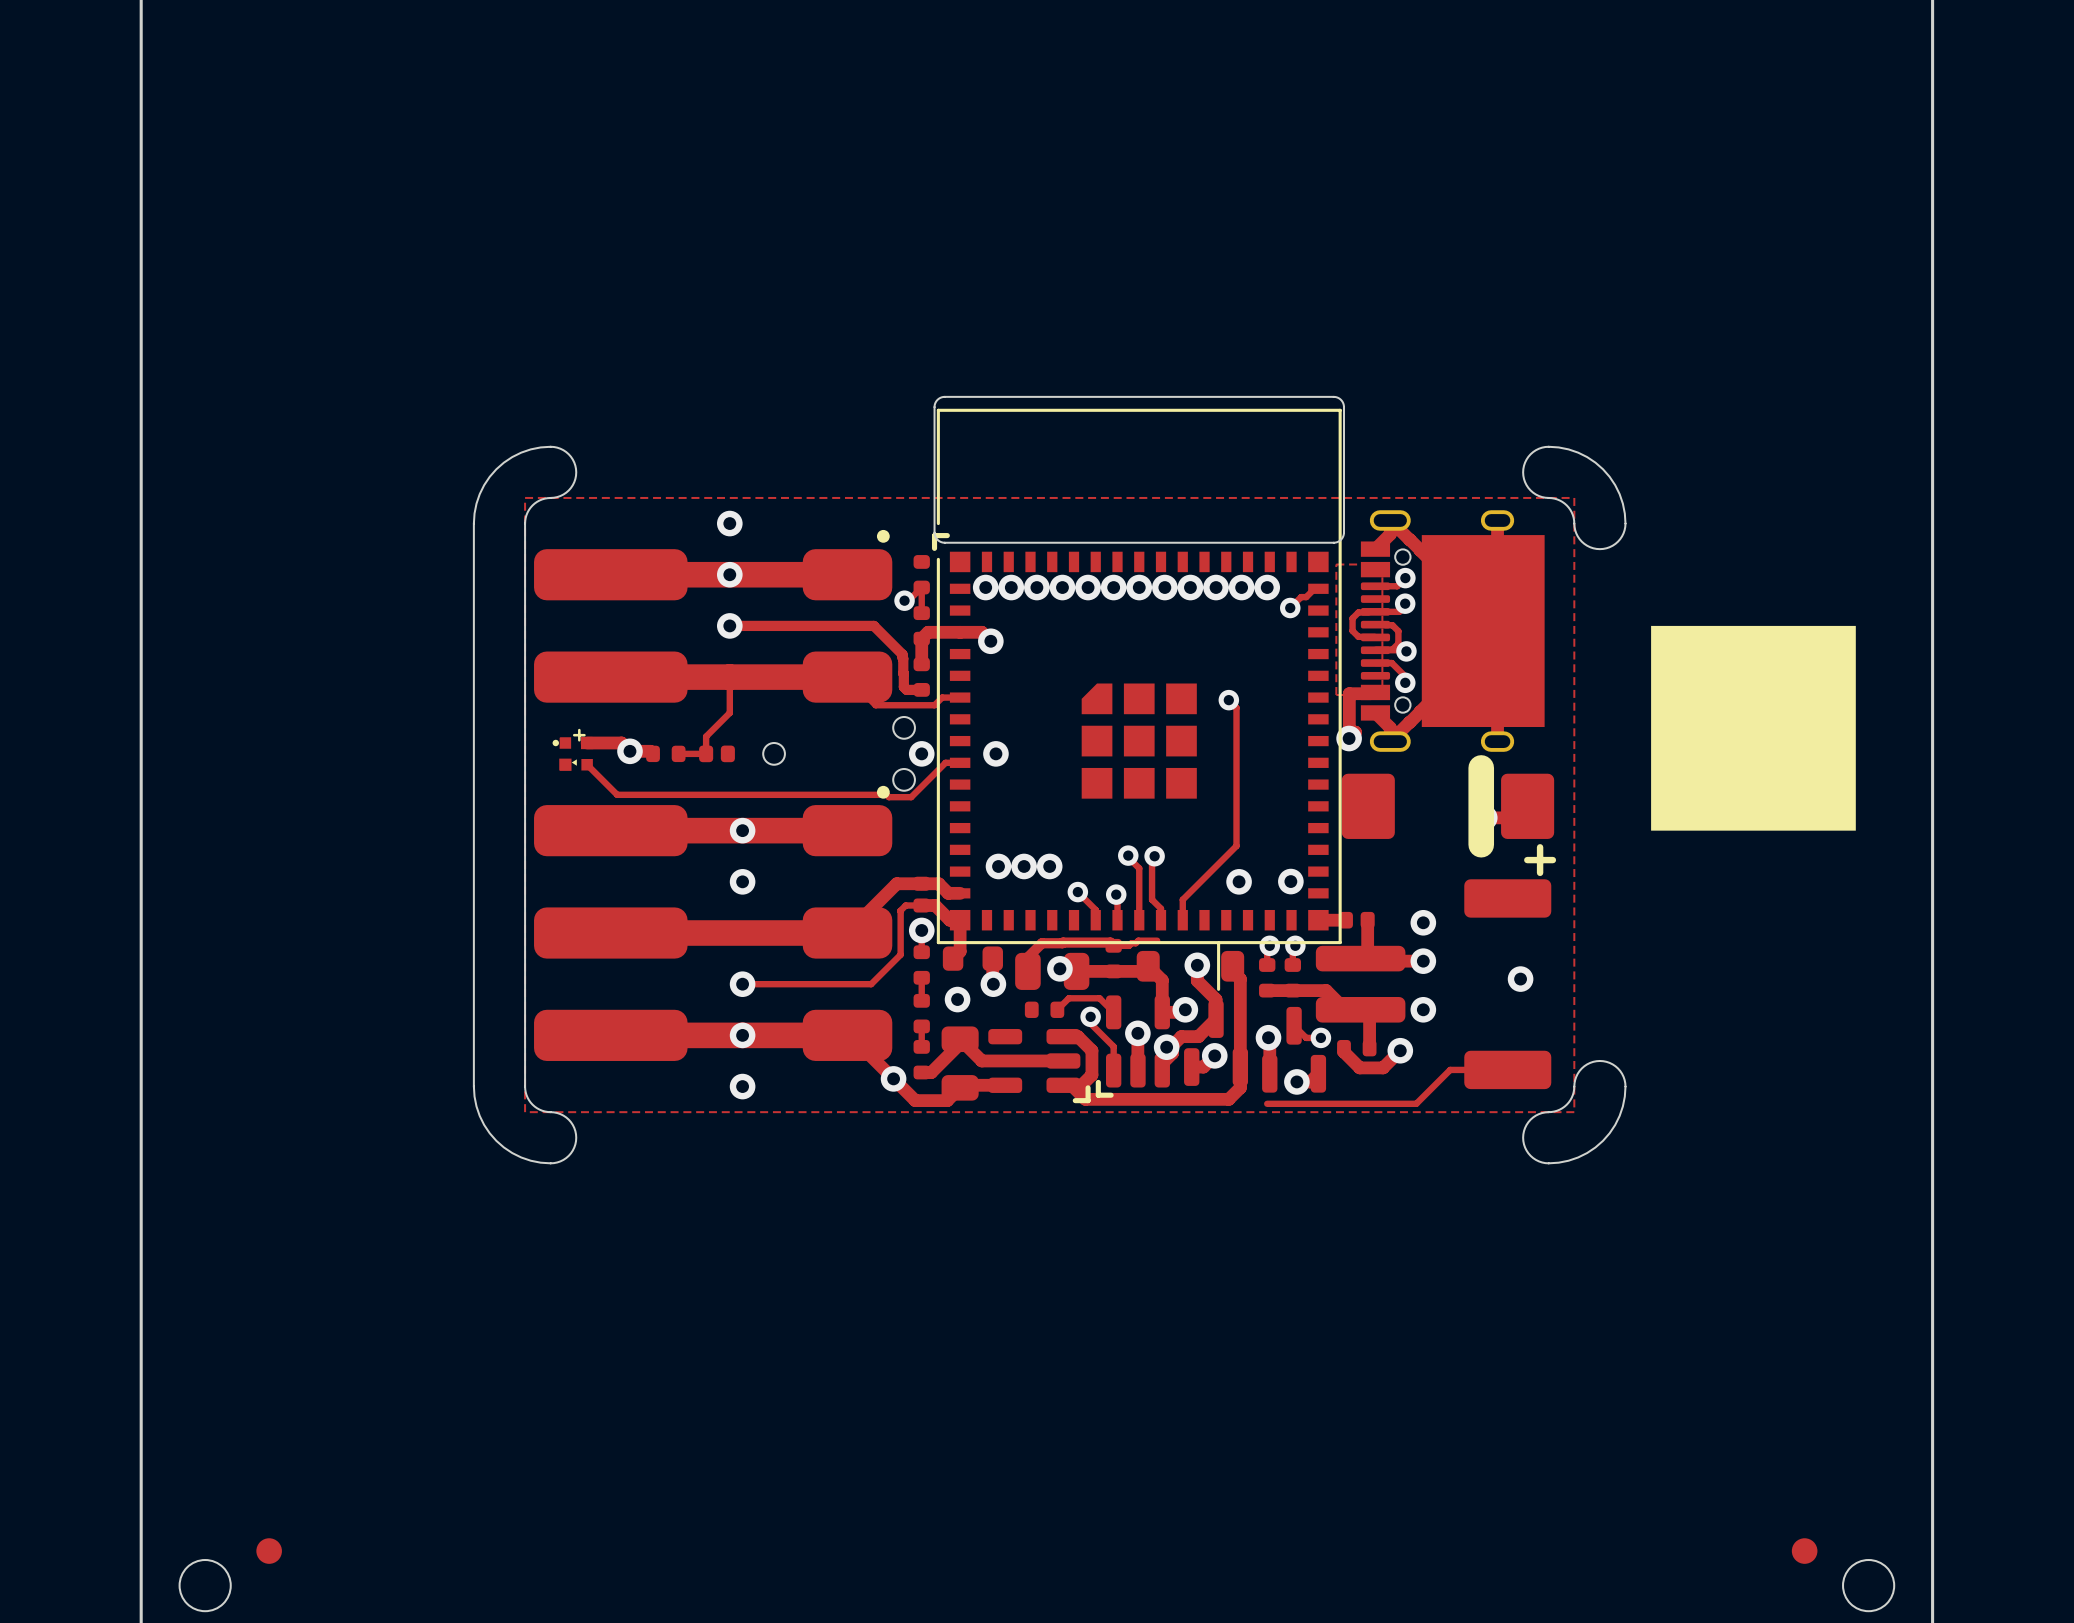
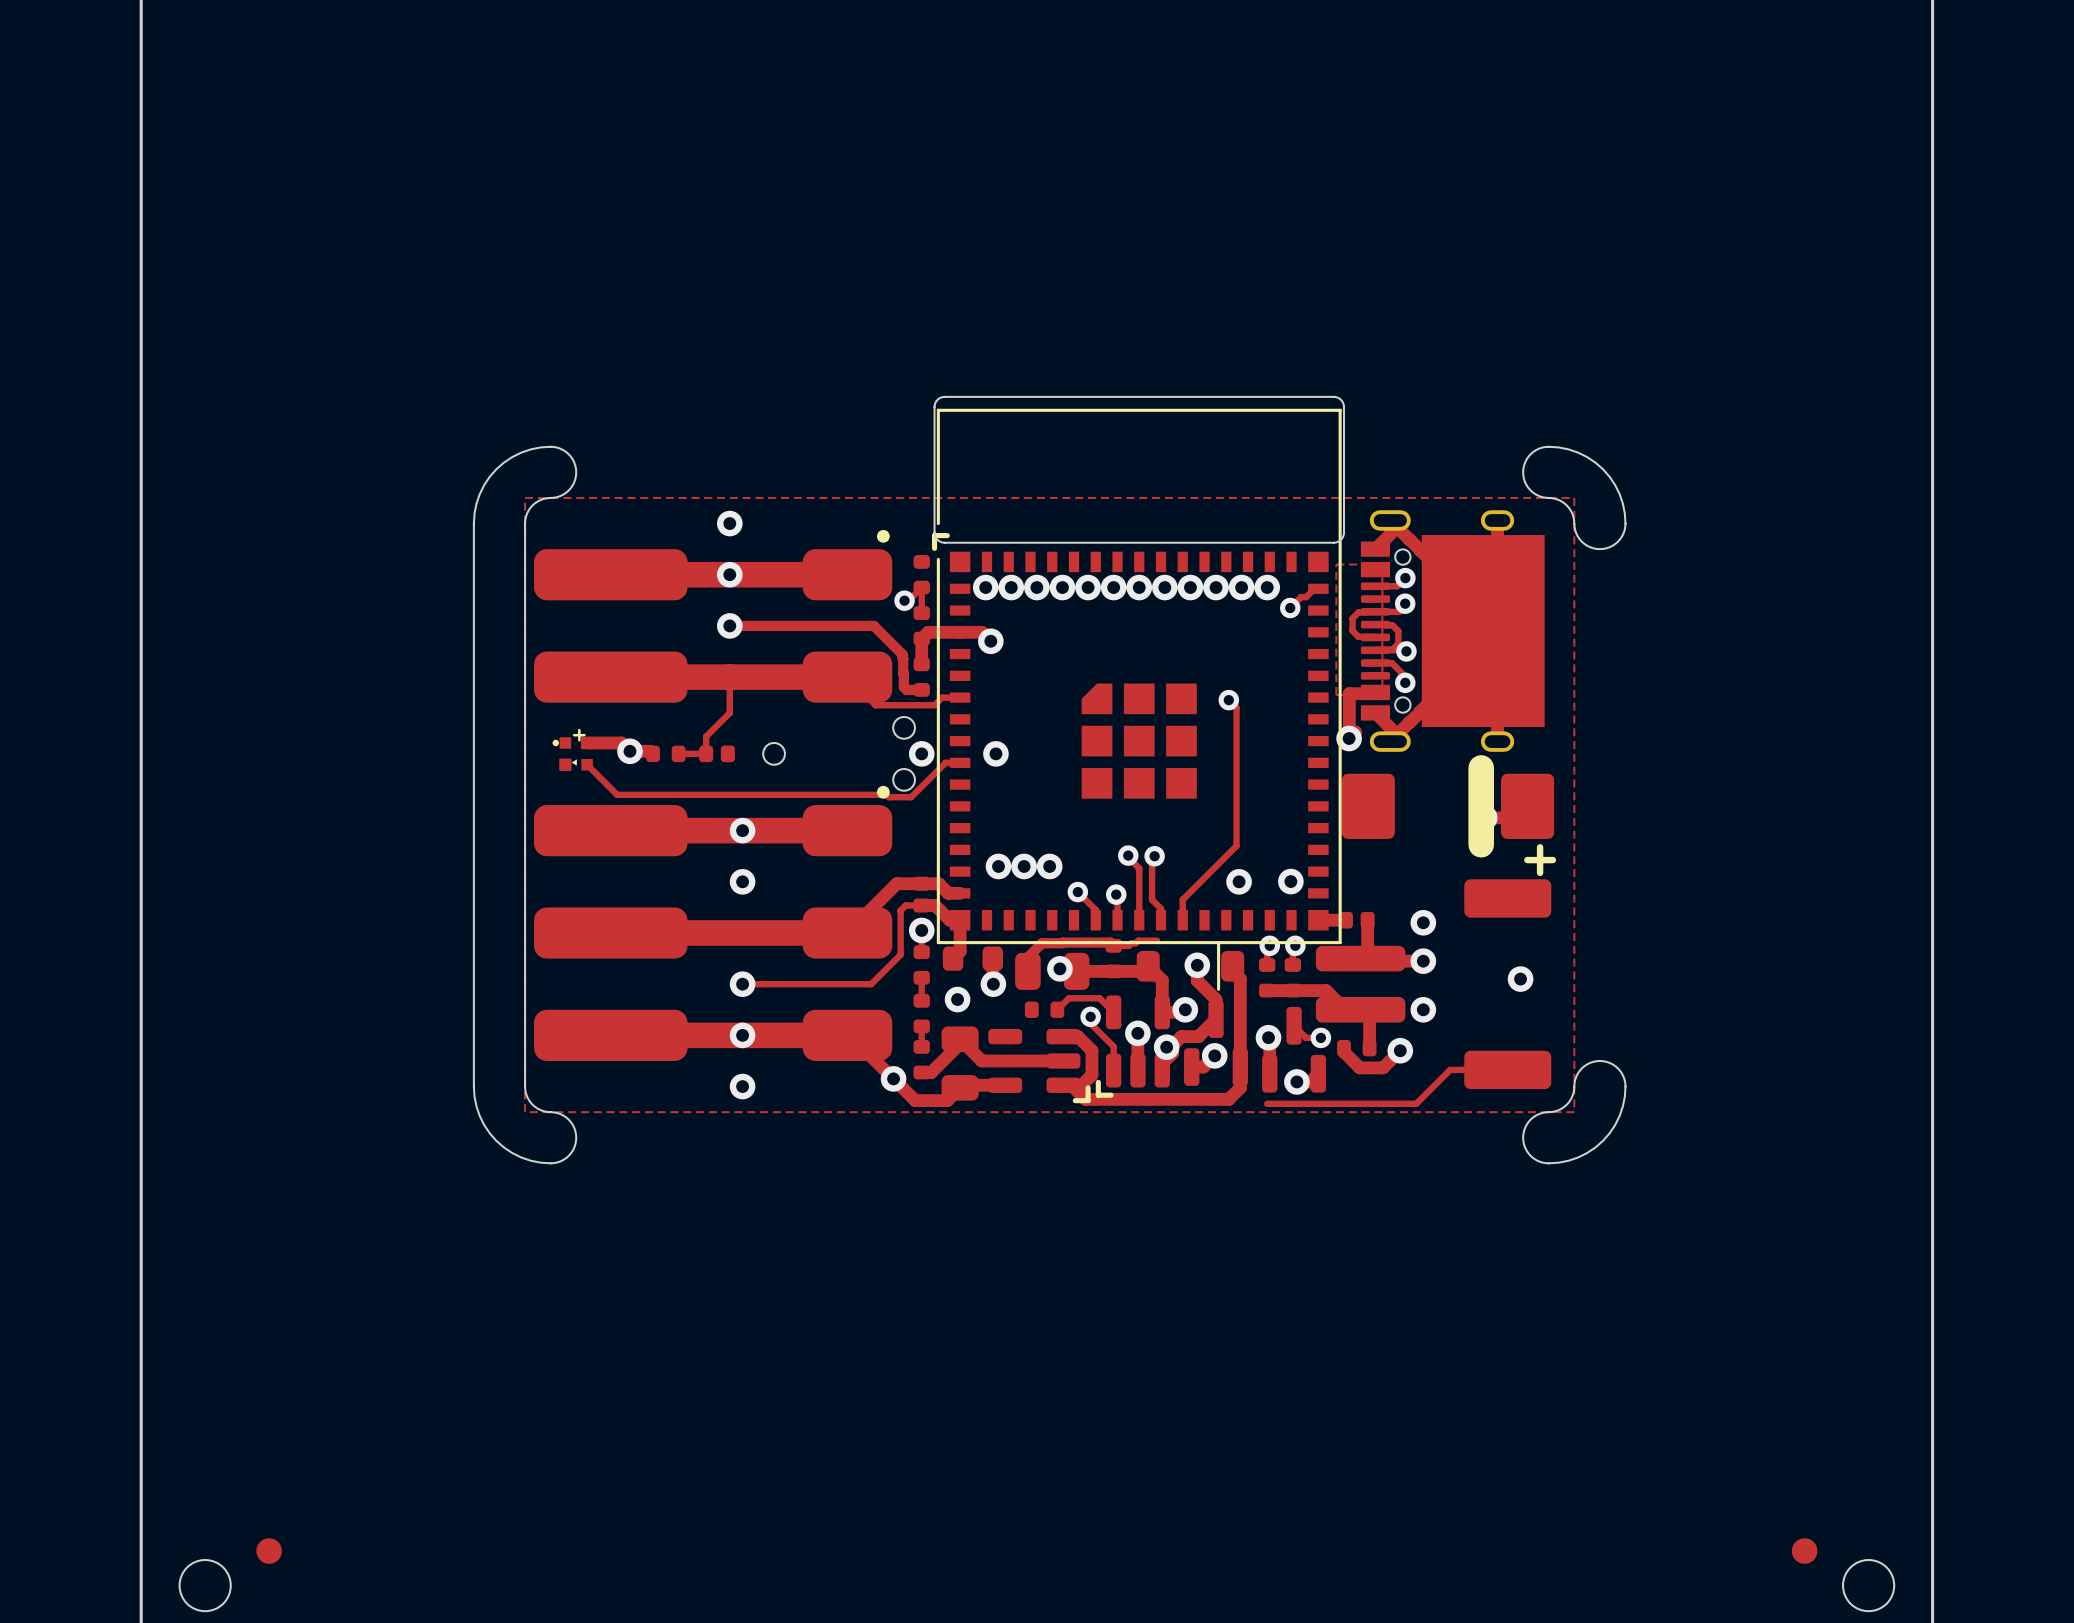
drawing: [1651, 625, 1856, 831] -> none

